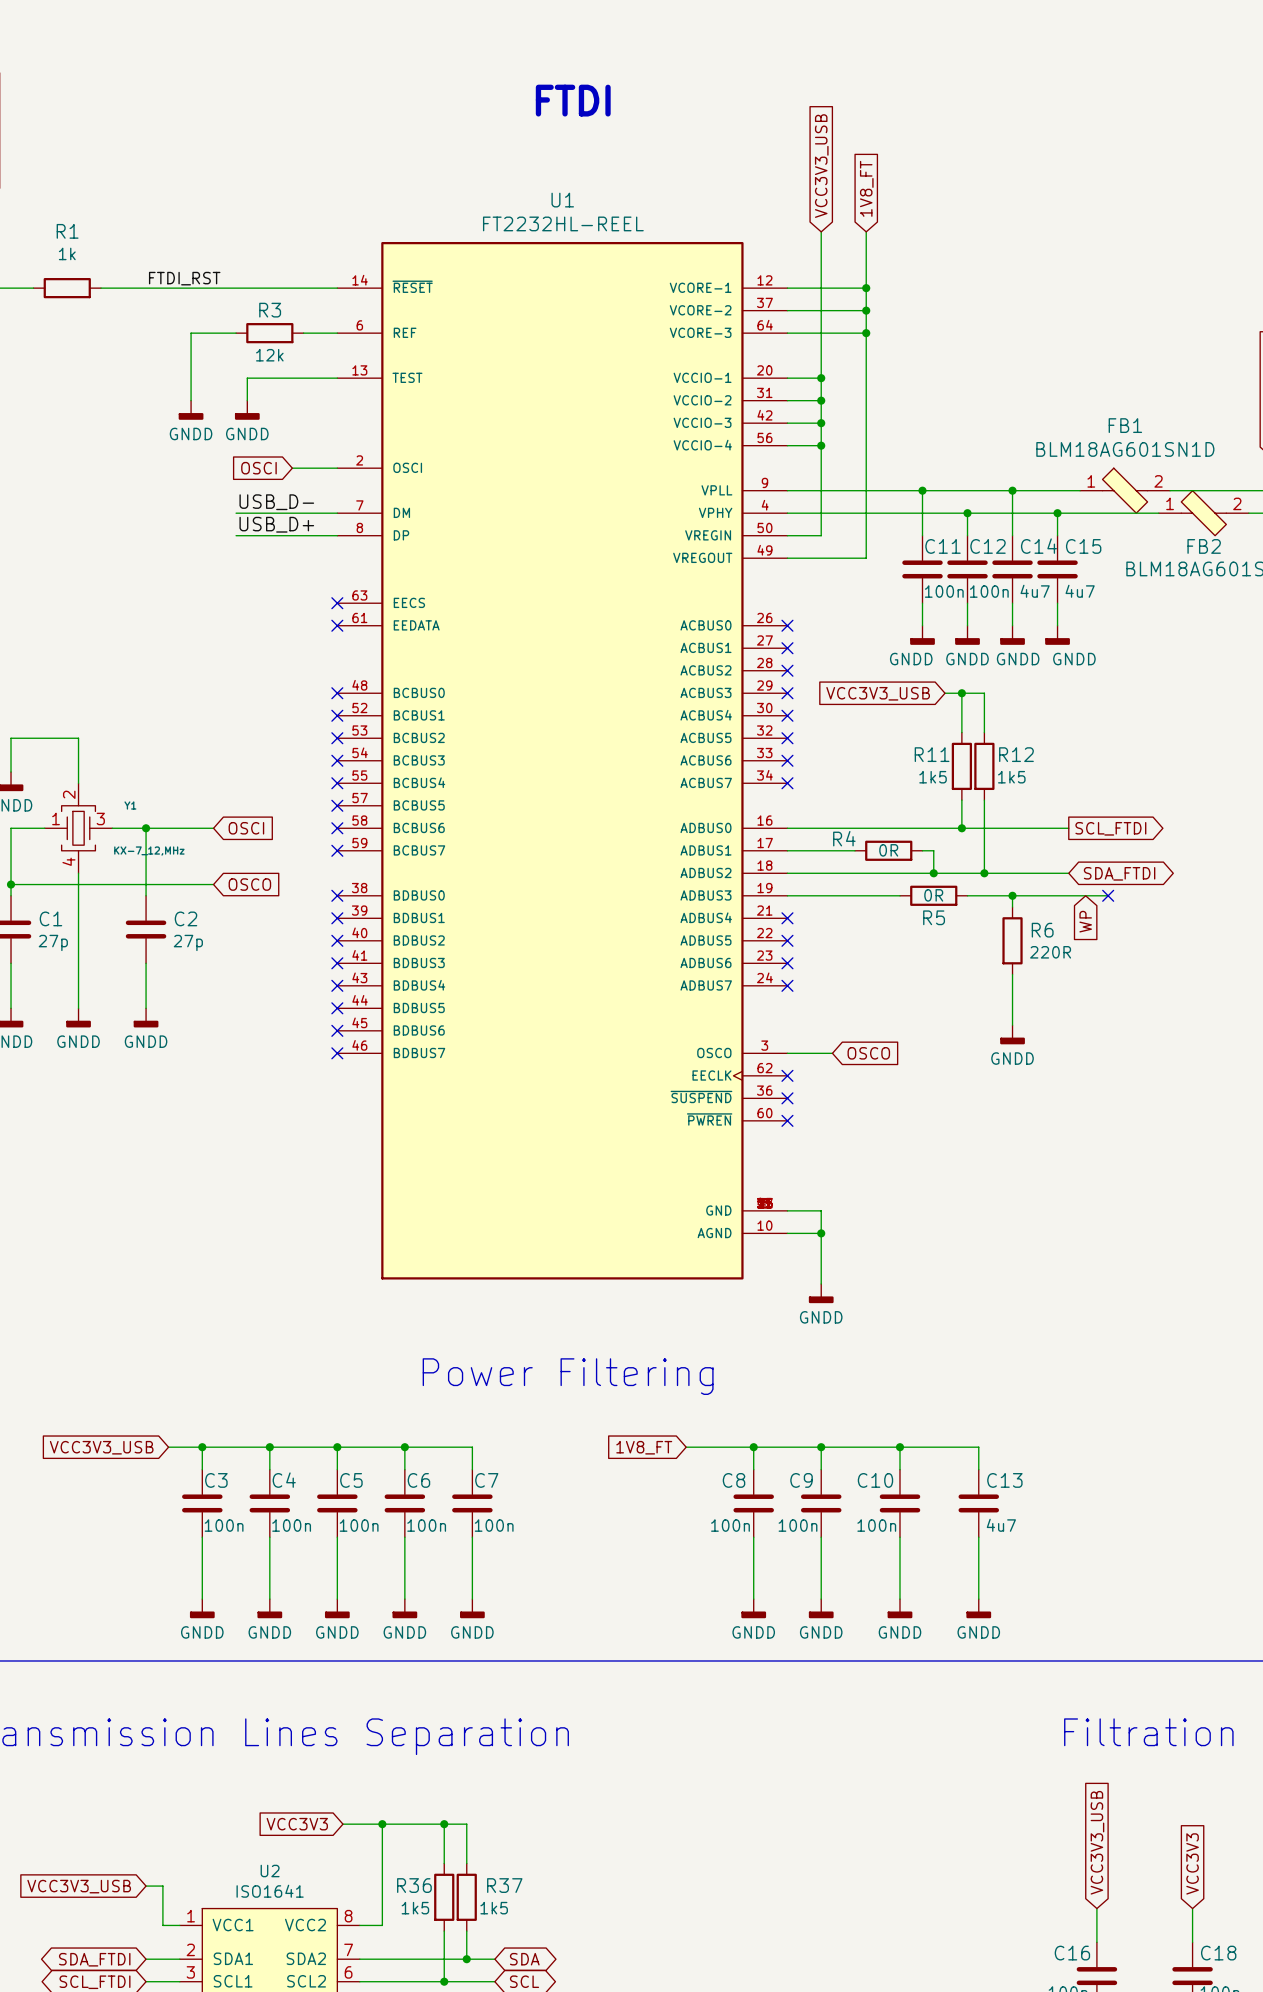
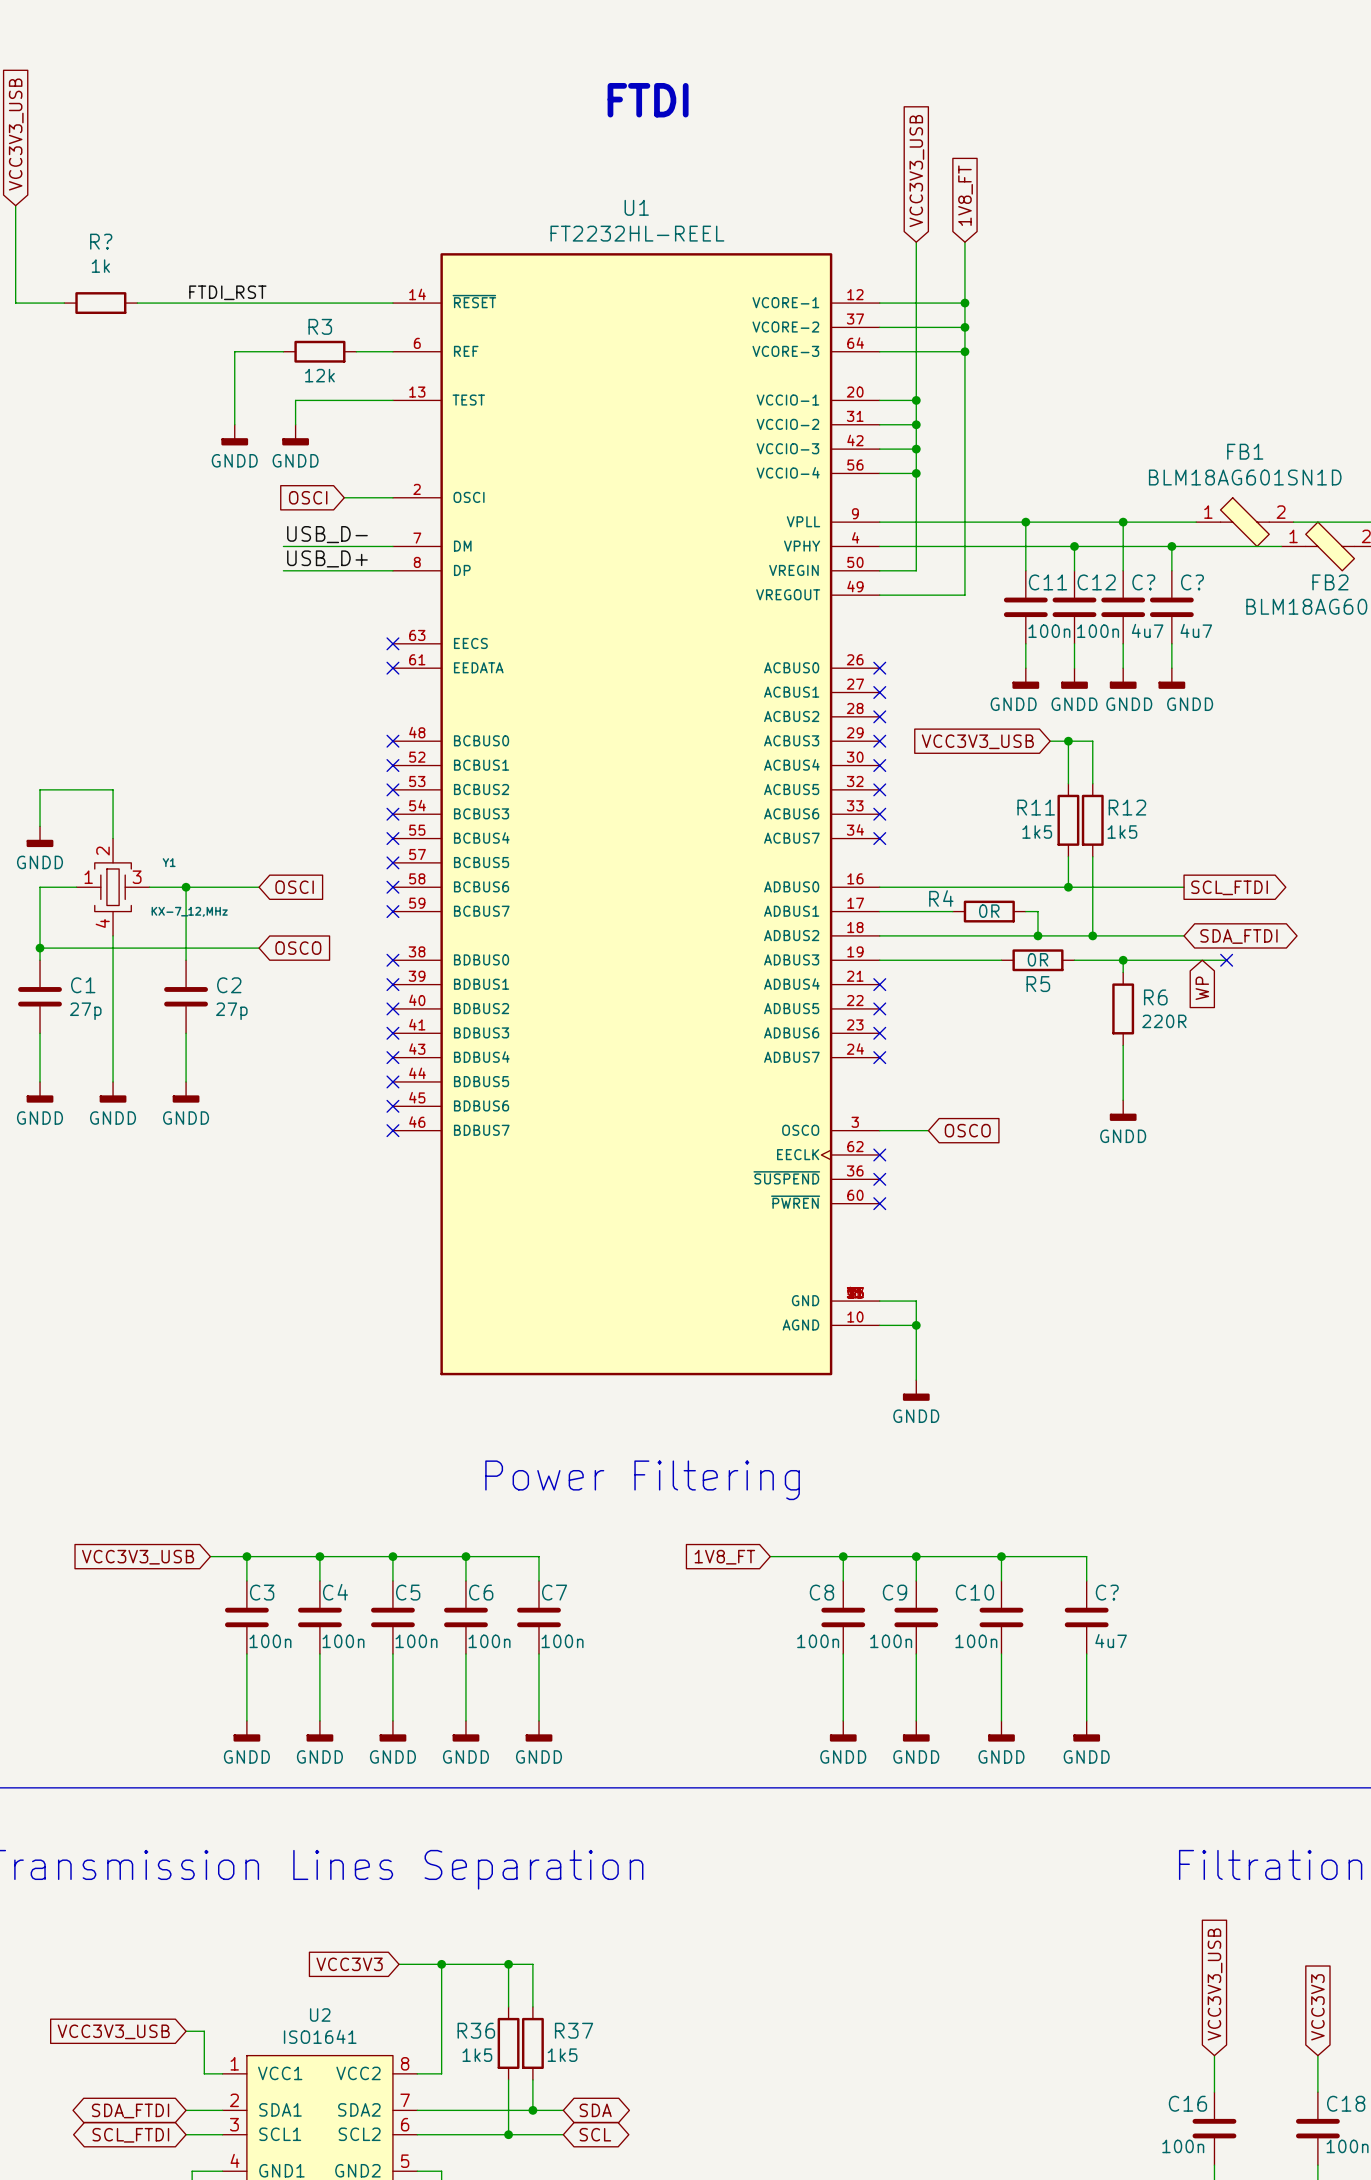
R1 name: R1 (67, 231) -> R? (101, 241)
C14 name: C14 (1038, 546) -> C? (1143, 582)
C15 name: C15 (1083, 546) -> C? (1192, 582)
C13 name: C13 (1004, 1480) -> C? (1107, 1592)

